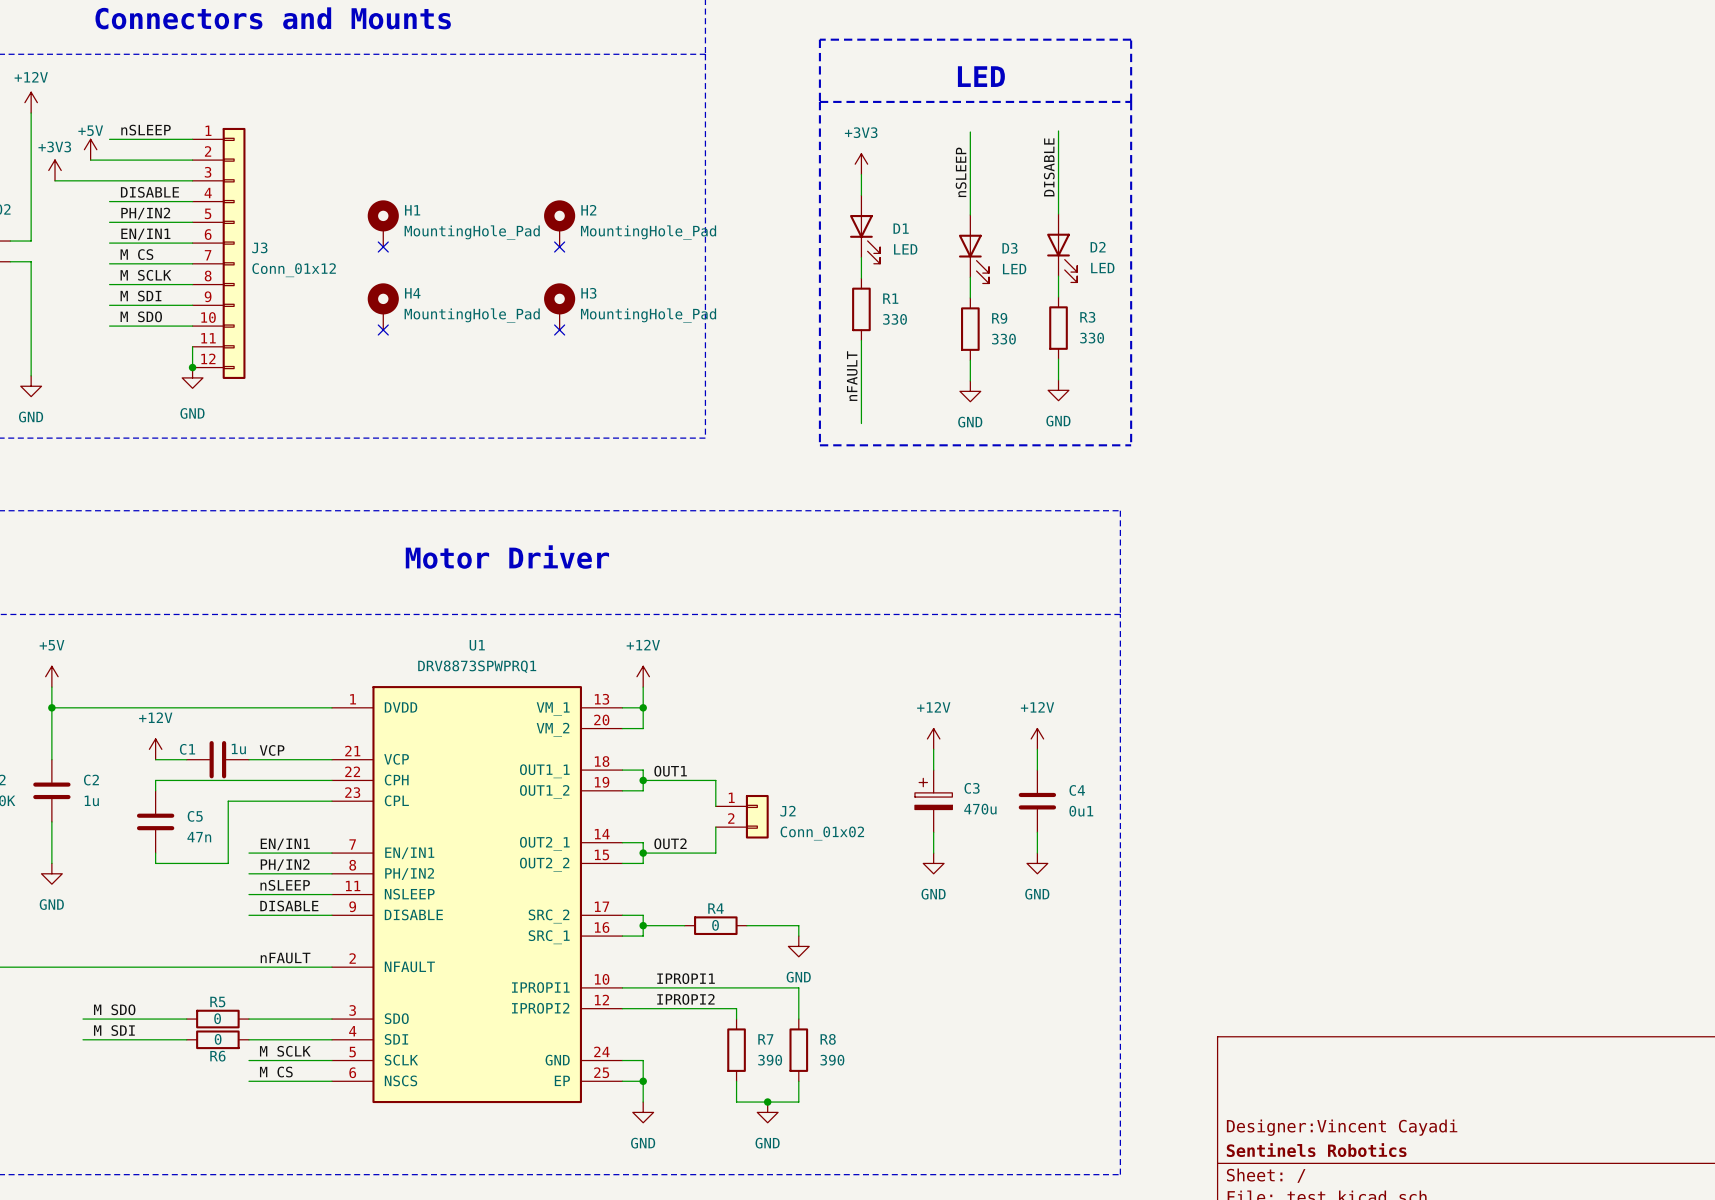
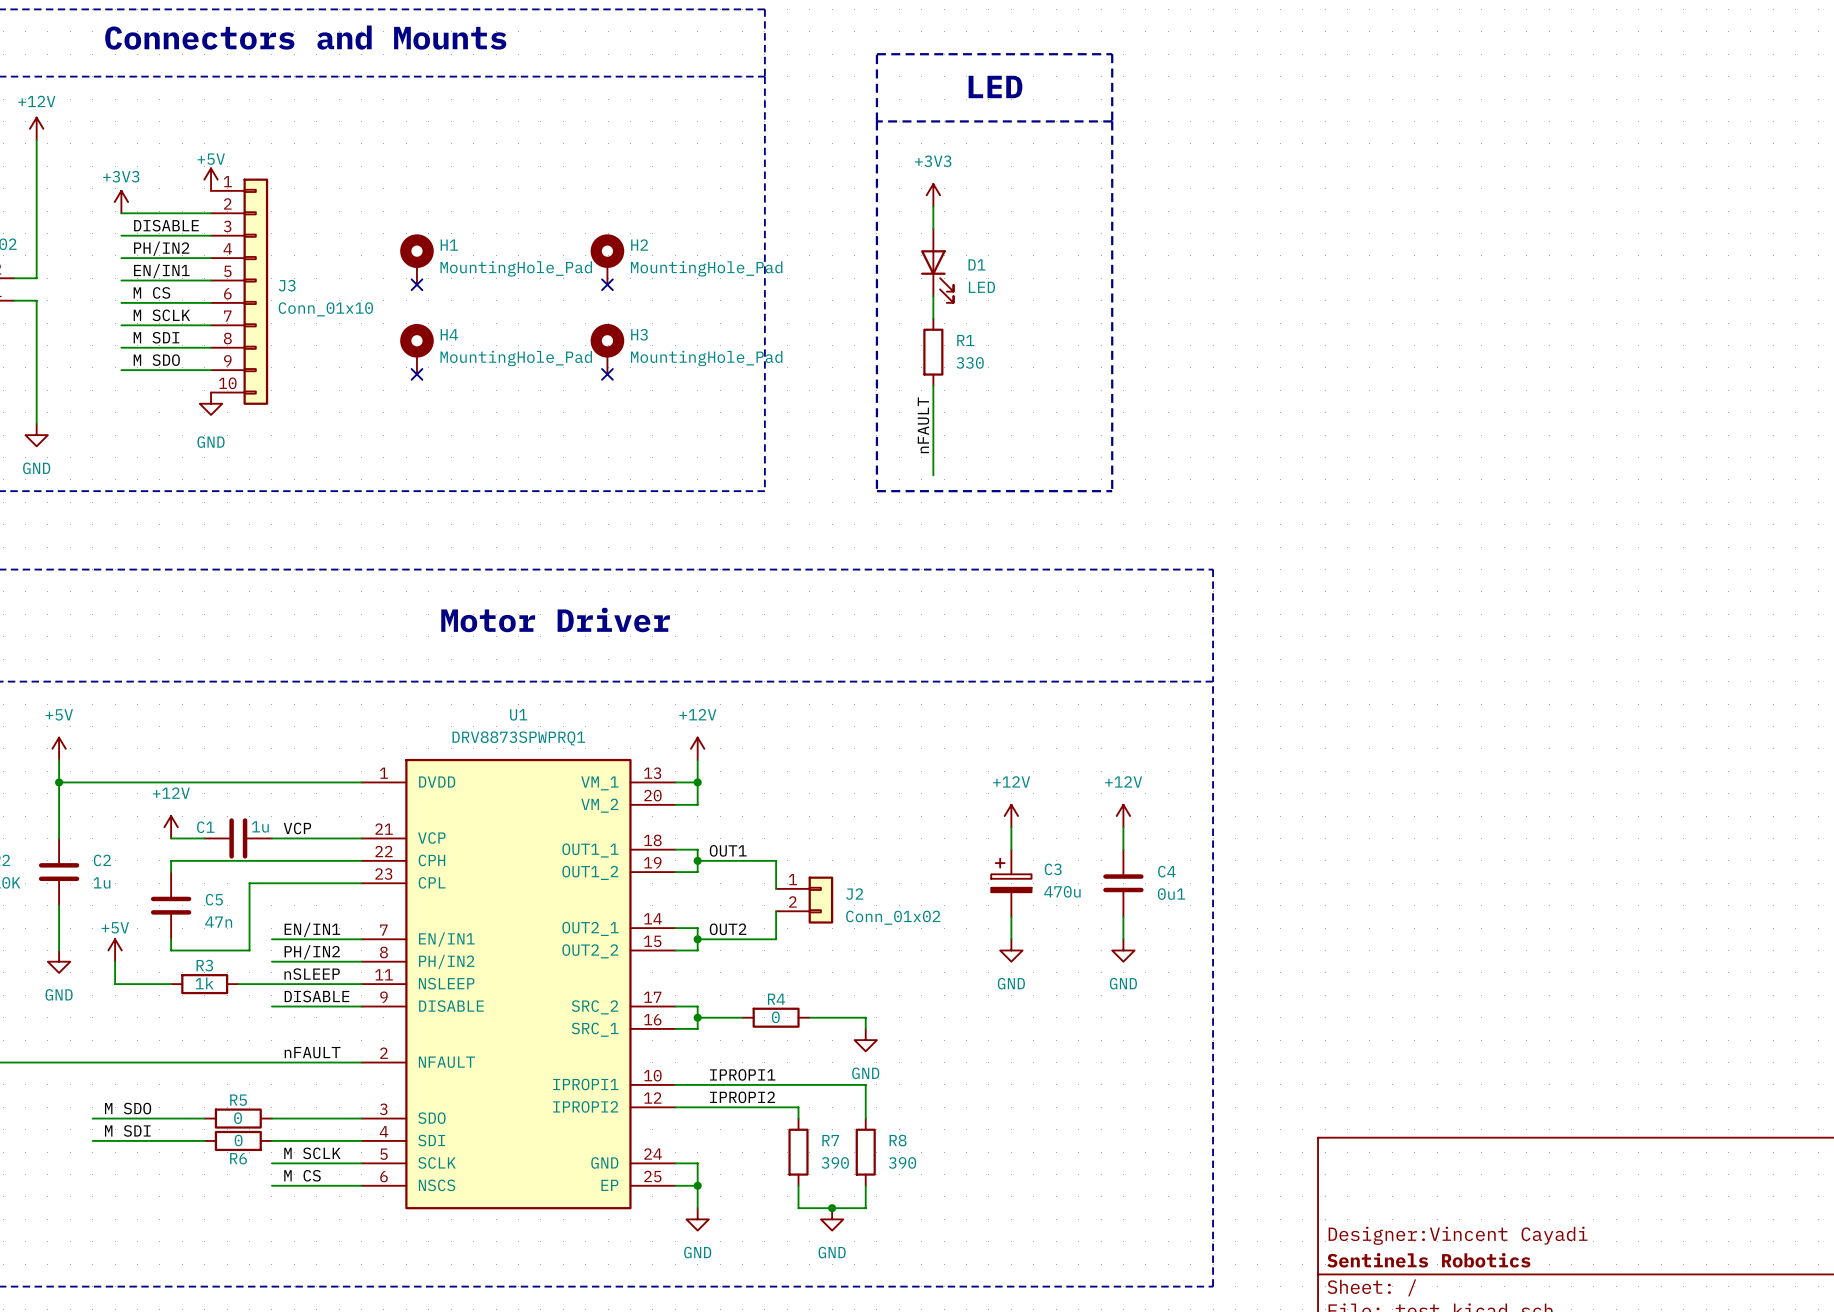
line: none -> (876, 54) (876, 491) (1112, 491) (1112, 54) (876, 54)
text position: LED (981, 76) -> LED (995, 86)
line: none -> (876, 121) (1112, 121)
line: (819, 101) (1131, 101) -> none
J3 symbol: [192, 127, 246, 379] -> [211, 178, 269, 405]
label: nSLEEP (146, 130) -> none
wire: (1058, 130) (1058, 213) -> none
wire: (970, 132) (970, 215) -> none
wire: (109, 139) (192, 139) -> none
power symbol position: +5V (90, 149) -> +5V (211, 179)
wire: (90, 160) (192, 160) -> none
label: DISABLE (1049, 167) -> none
power symbol position: +3V3 (55, 170) -> +3V3 (121, 202)
label: nSLEEP (961, 172) -> none
wire: (55, 180) (109, 180) -> none
D2: LED (1062, 248) -> none
D3: LED (973, 249) -> none
J3 value: Conn_01x12 (294, 270) -> Conn_01x10 (325, 309)
wire: (1058, 276) (1058, 296) -> none
wire: (970, 277) (970, 297) -> none
R3 name position: R3 (1087, 317) -> R3 (204, 965)
R3 rotation: 0° (1058, 328) -> 90° clockwise (204, 984)
R3 position: (1058, 328) -> (204, 984)
R9: 330 (970, 329) -> none
R3 value: 330 (1092, 338) -> 1k (204, 983)
wire: (1058, 359) (1058, 379) -> none
wire: (970, 360) (970, 380) -> none
junction: (192, 367) -> none
power symbol position: GND (192, 377) -> GND (211, 403)
power symbol: GND (1058, 390) -> none
power symbol: GND (970, 391) -> none
line: (819, 444) (819, 39) (1131, 39) (1131, 445) (819, 445) -> none
power symbol: none -> +5V (115, 950)
wire: none -> (115, 961) (115, 984) (171, 984)
wire: none -> (238, 984) (271, 984)

